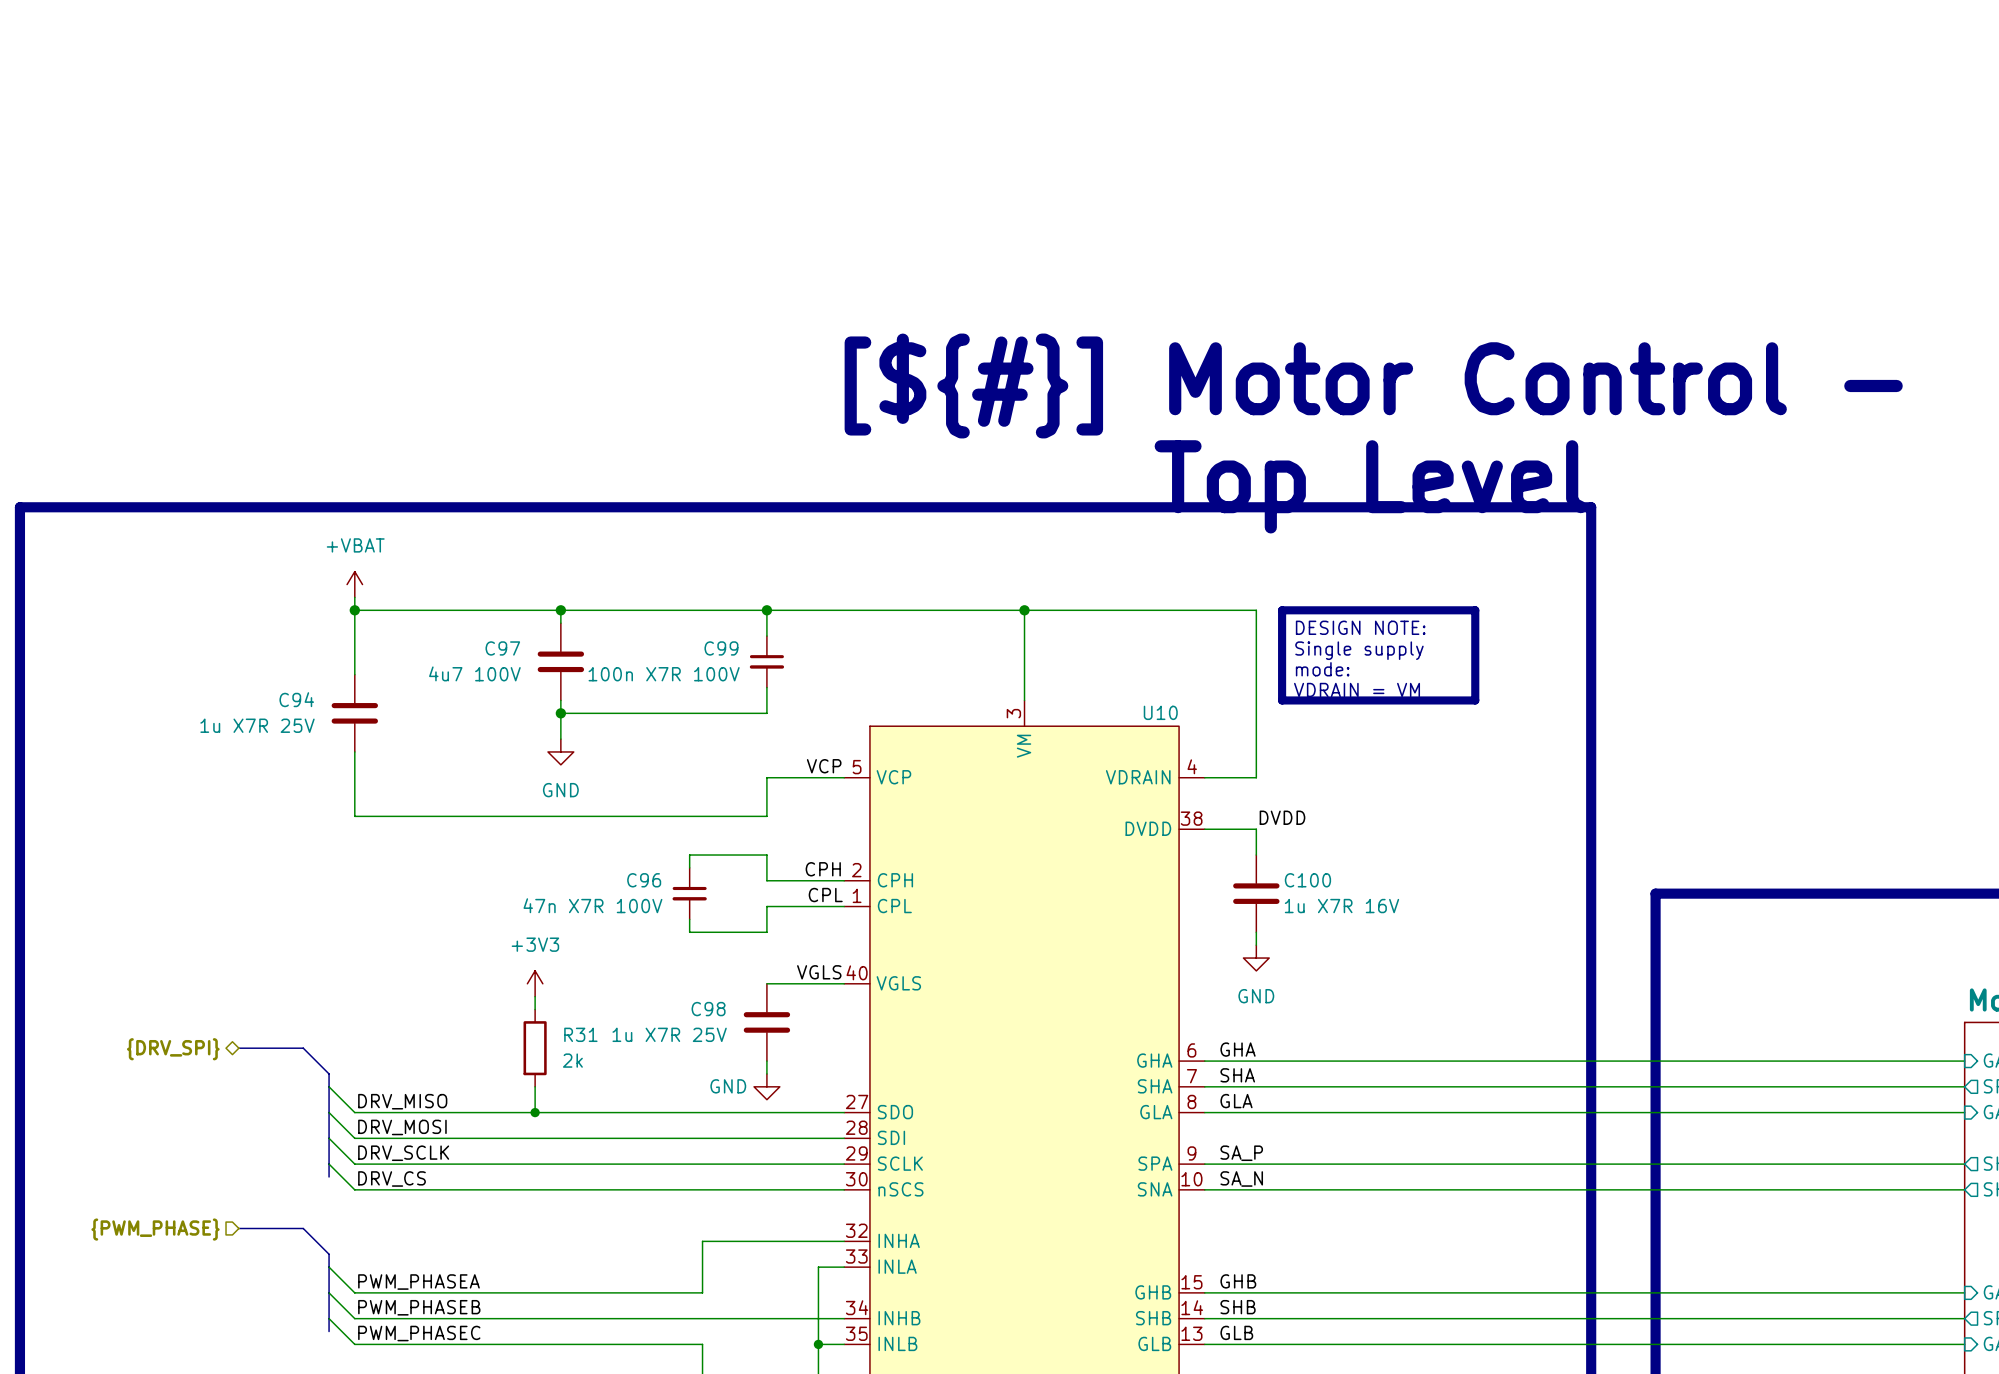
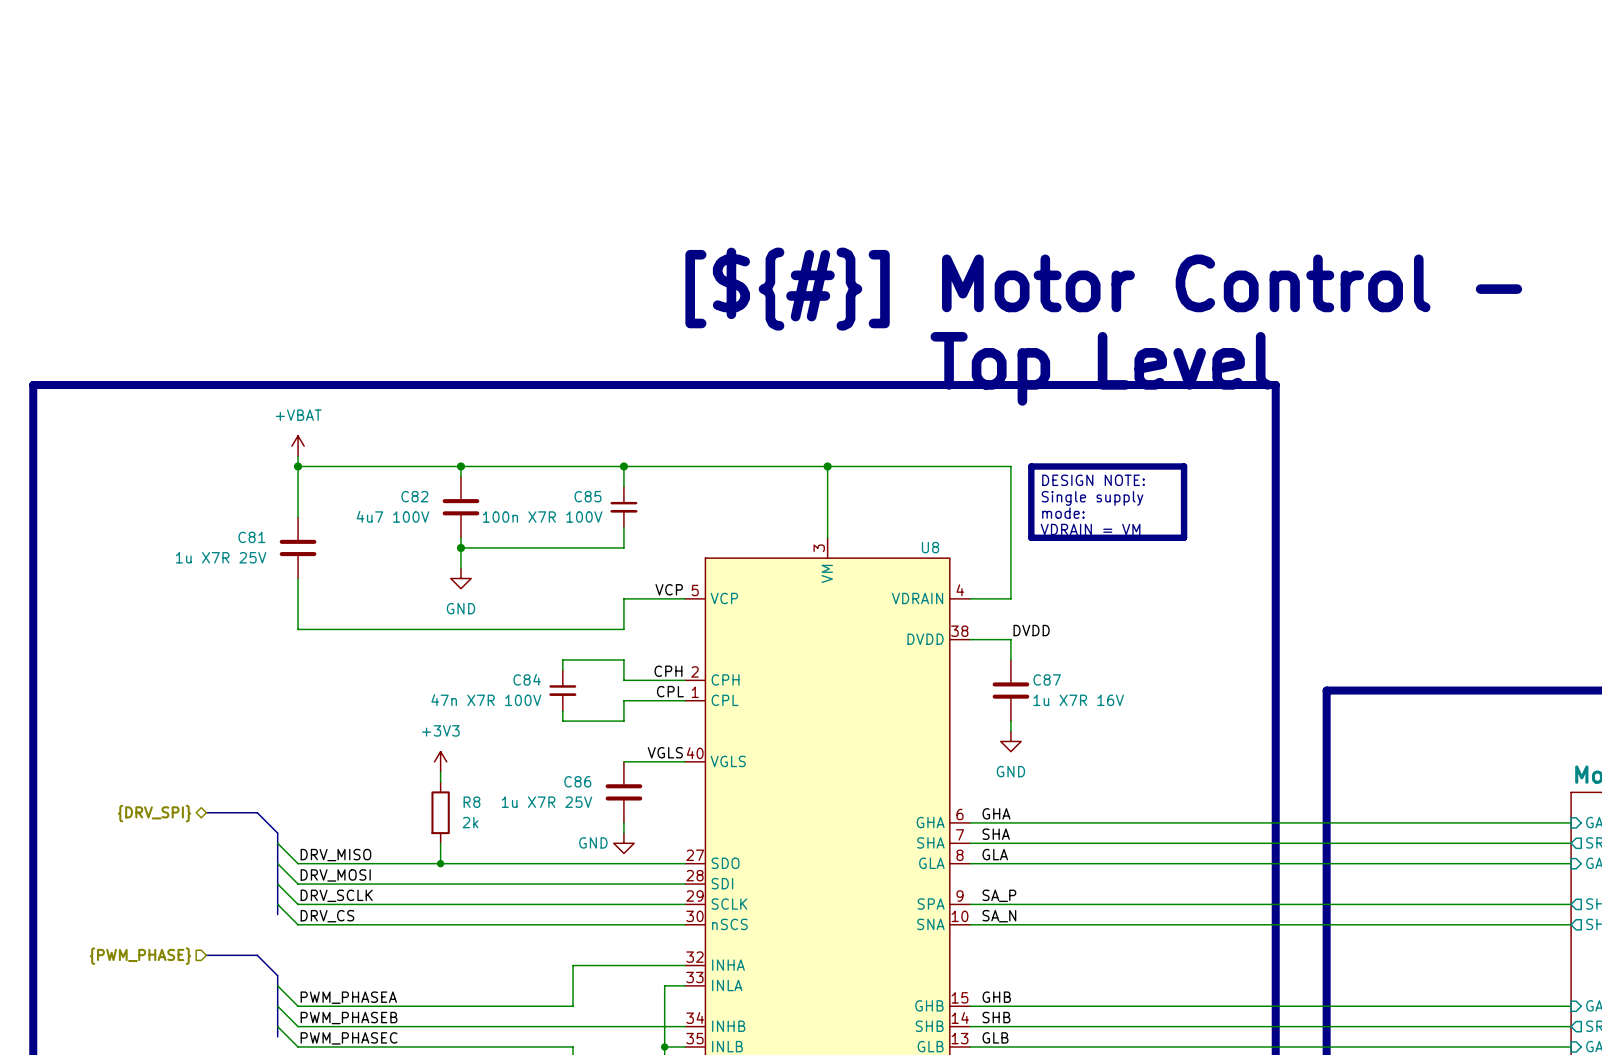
C97 name: C97 (502, 648) -> C82 (414, 496)
C99 name: C99 (721, 648) -> C85 (587, 496)
C94 name: C94 (296, 699) -> C81 (251, 537)
U10 name: U10 (1160, 712) -> U8 (930, 547)
C96 name: C96 (644, 880) -> C84 (527, 679)
C100 name: C100 (1307, 880) -> C87 (1047, 679)
C98 name: C98 (708, 1009) -> C86 (577, 781)
R31 name: R31 (580, 1034) -> R8 (471, 802)

